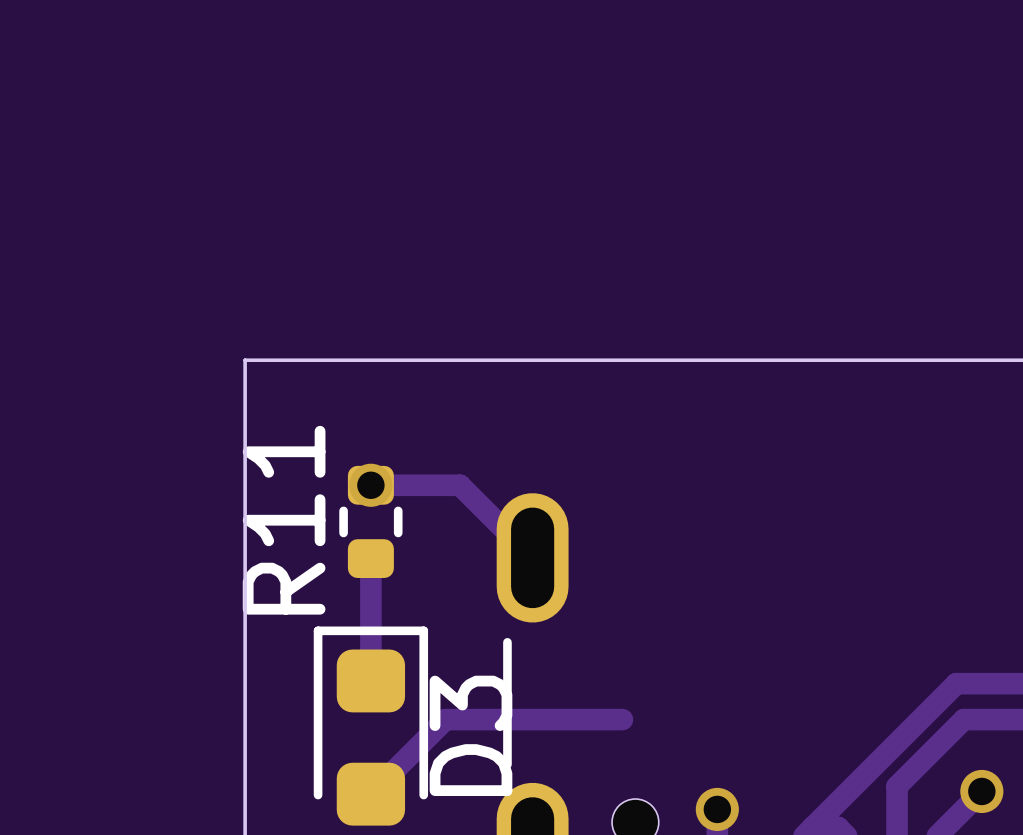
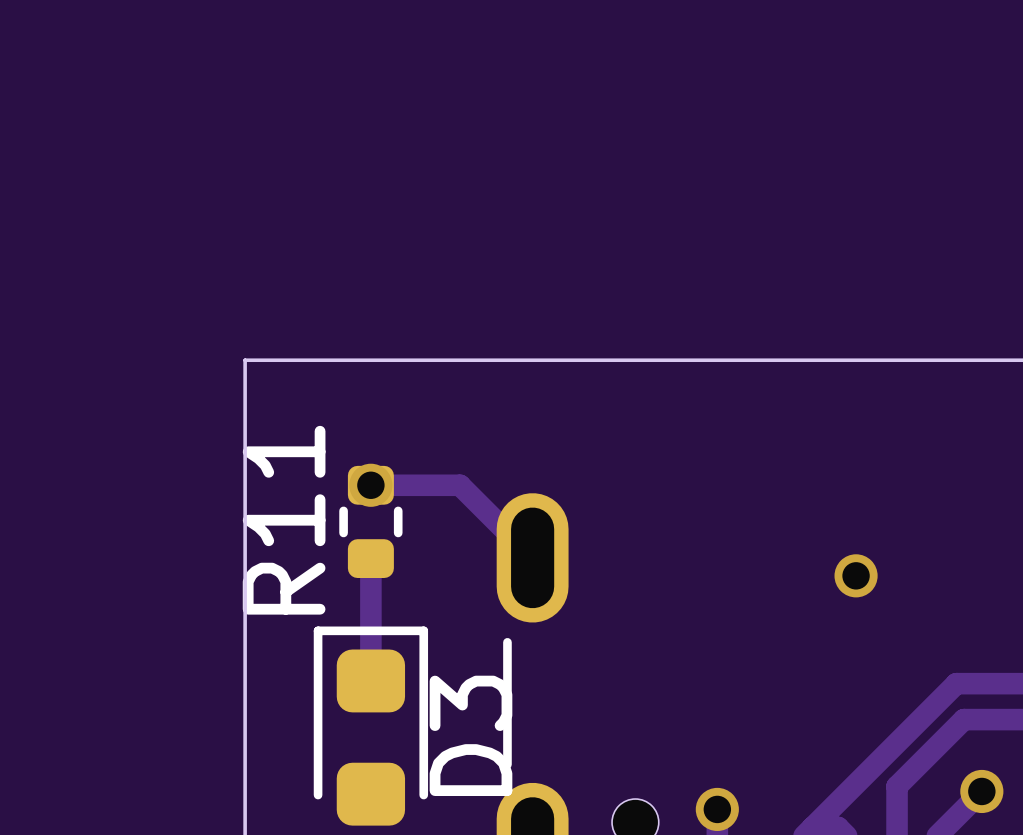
via: none -> (856, 575)
track: (622, 719) (445, 719) (370, 794) -> none

